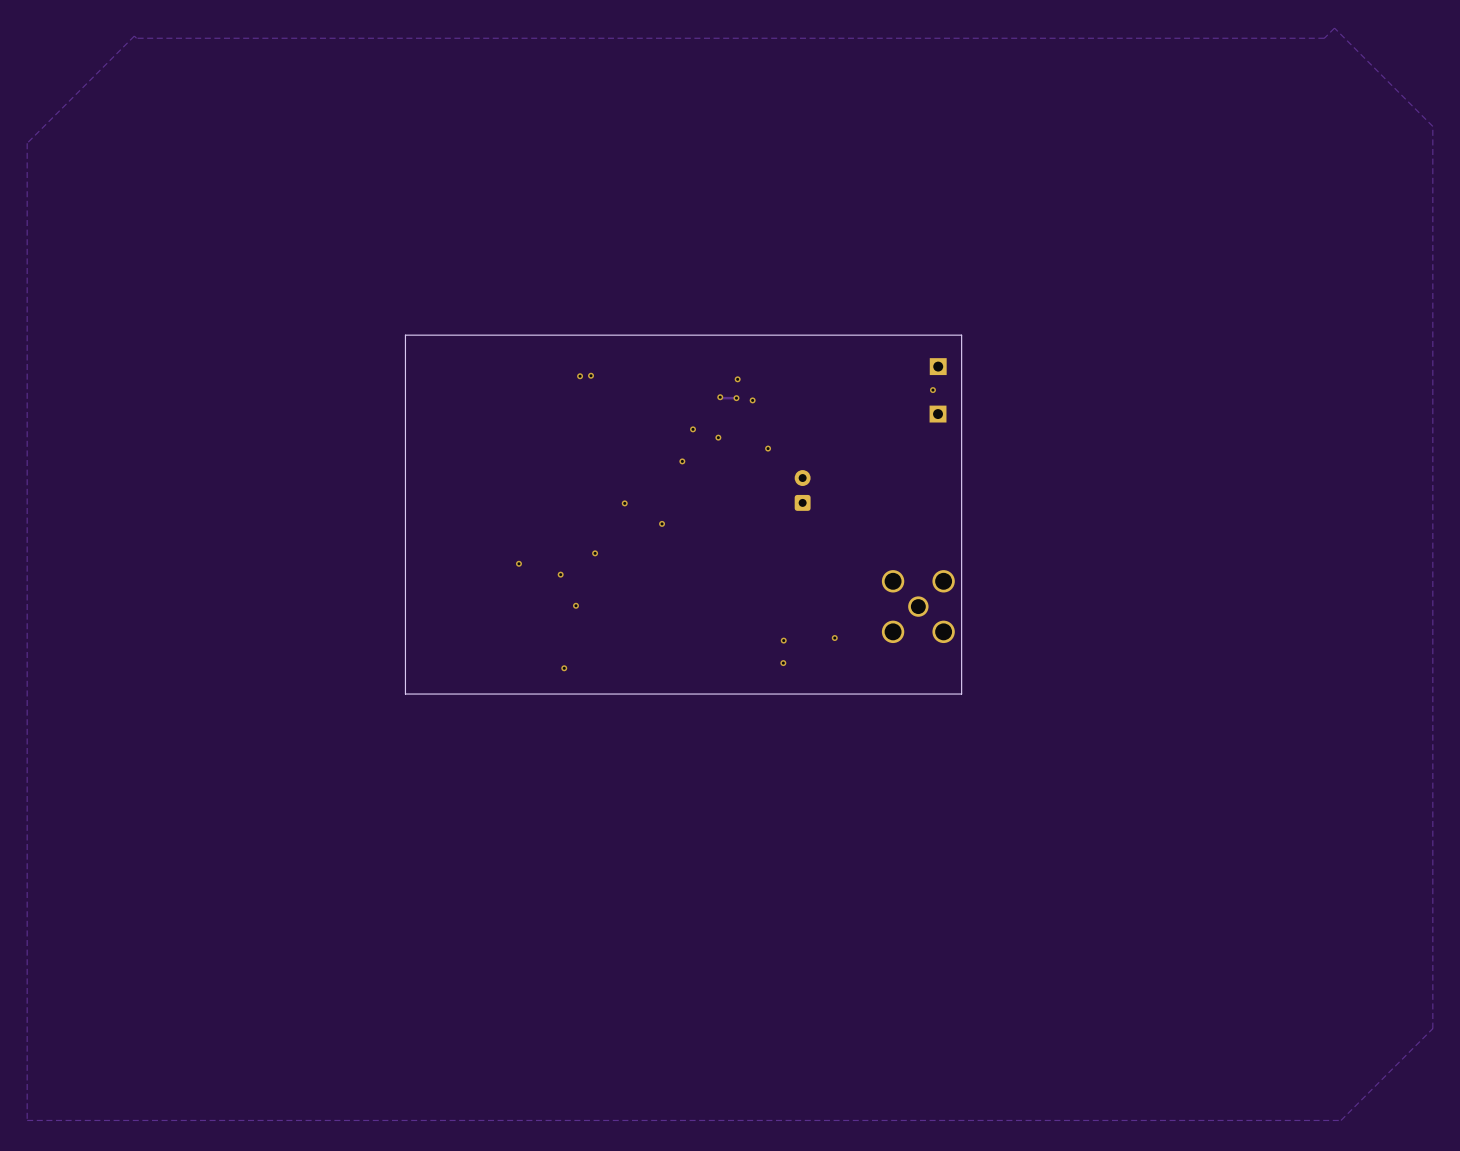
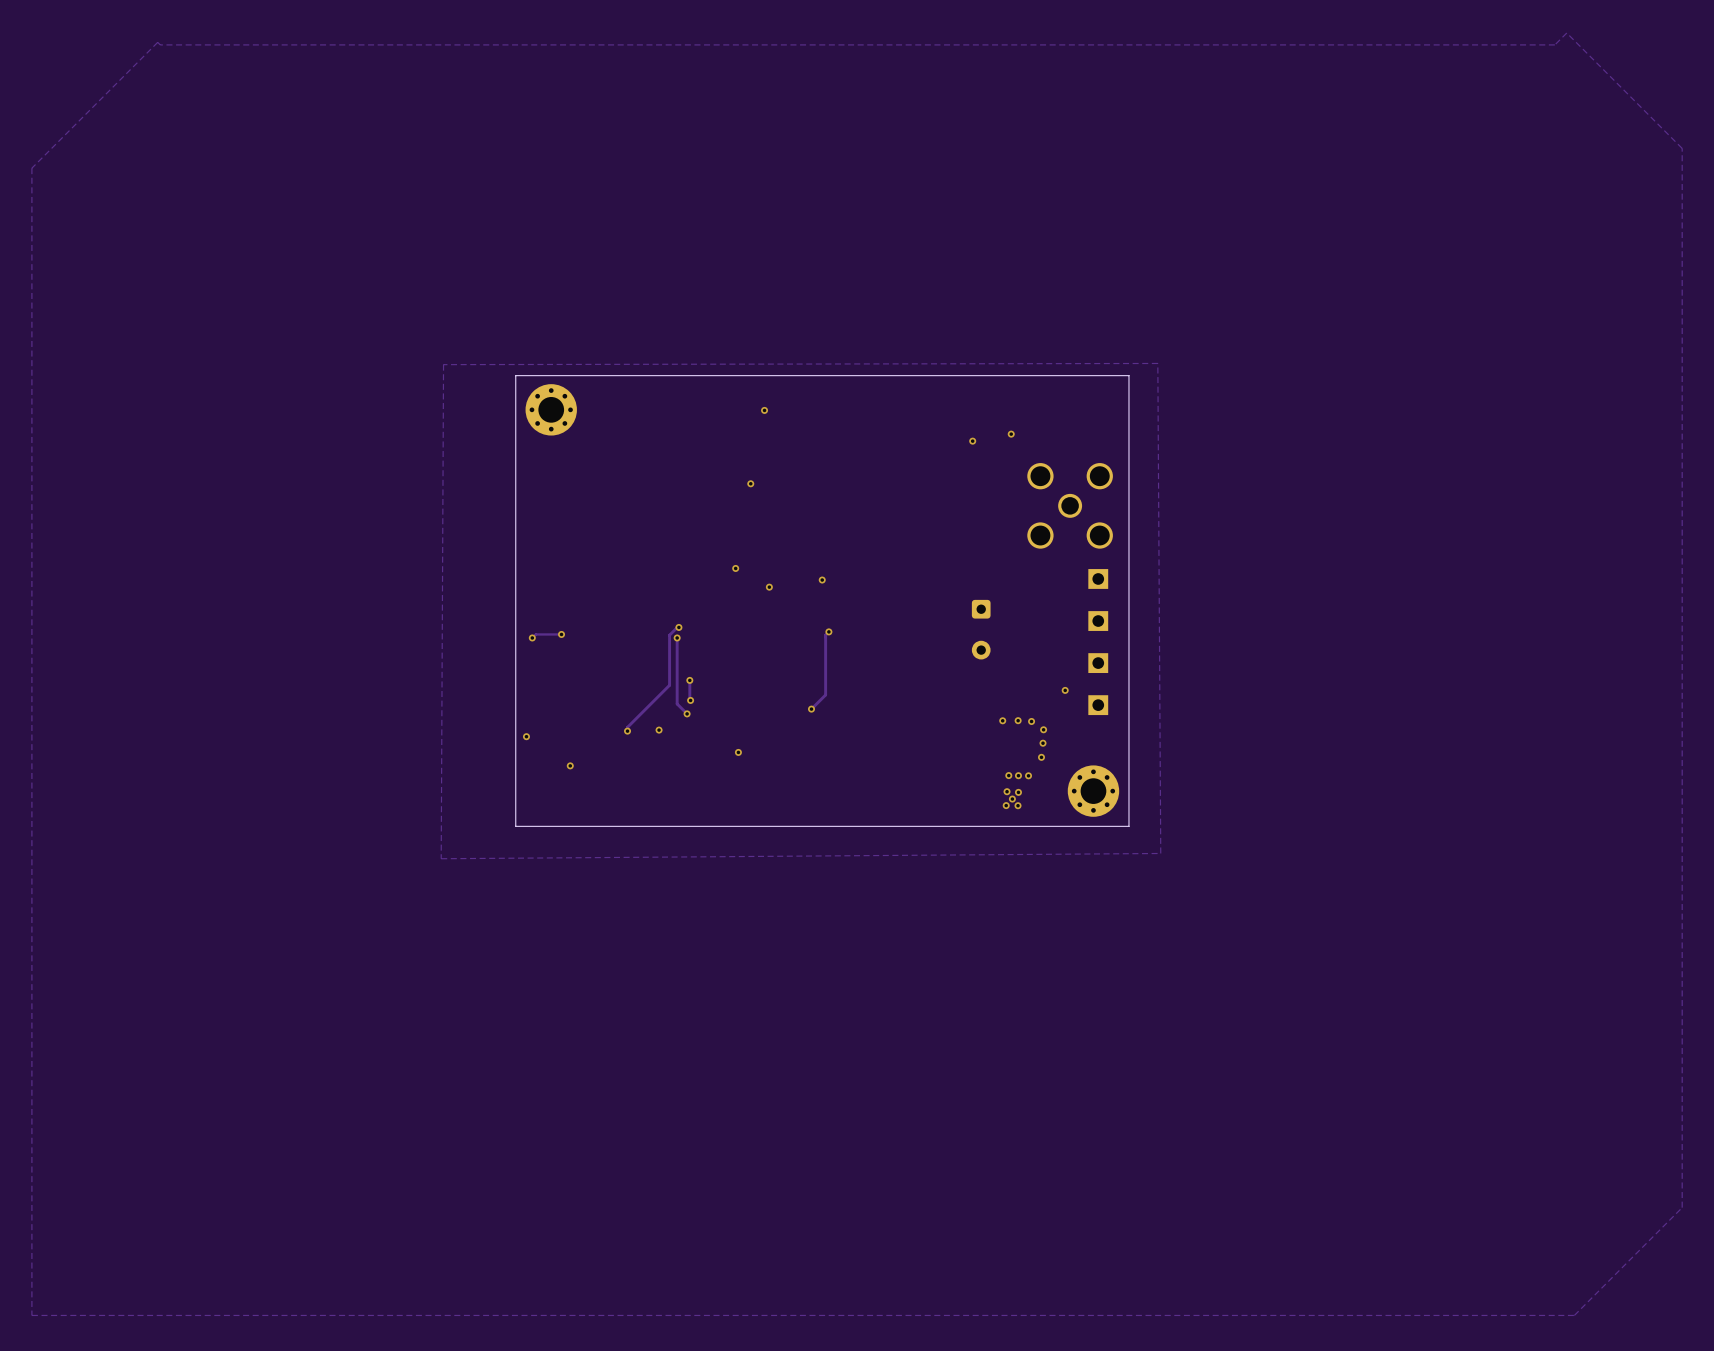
zone outline: none -> (1157, 363) (443, 364) (441, 858) (1160, 853) (1157, 363)
board edge: (961, 335) (405, 335) (405, 694) (961, 694) -> (1128, 393) (1128, 375) (515, 375) (515, 826) (1128, 826) (1128, 814)
part: none -> (551, 409)
via: none -> (764, 410)
part: (938, 366) -> none
via: none -> (1011, 434)
via: (591, 375) -> none
via: none -> (972, 441)
via: (580, 376) -> none
via: (737, 379) -> none
via: (932, 390) -> none
track: (720, 397) (736, 398) -> none
via: (720, 397) -> none
via: (736, 398) -> none
via: (752, 400) -> none
via: none -> (750, 483)
part: (938, 414) -> none
via: (693, 429) -> none
via: (718, 437) -> none
via: (768, 448) -> none
via: (682, 461) -> none
via: none -> (735, 568)
part: (802, 490) -> none
part: none -> (1098, 578)
via: none -> (822, 580)
via: none -> (769, 587)
via: (624, 503) -> none
via: (662, 523) -> none
part: none -> (1098, 621)
track: none -> (678, 627) (669, 635) (669, 685) (627, 727) (627, 731)
via: none -> (678, 627)
part: none -> (981, 629)
track: none -> (828, 631) (825, 635) (825, 694) (811, 709)
via: none -> (828, 631)
track: none -> (561, 634) (535, 634) (532, 637)
via: none -> (561, 634)
via: none -> (532, 637)
track: none -> (677, 637) (677, 703) (687, 713)
via: none -> (677, 637)
via: (595, 553) -> none
via: (518, 563) -> none
part: none -> (1098, 663)
via: (560, 574) -> none
track: none -> (689, 680) (690, 700)
via: none -> (689, 680)
via: none -> (1065, 690)
via: none -> (690, 700)
part: none -> (1098, 705)
via: none -> (811, 709)
via: (575, 605) -> none
part position: (918, 606) -> (1070, 505)
via: none -> (687, 713)
via: none -> (1002, 720)
via: none -> (1018, 720)
via: none -> (1031, 721)
via: none -> (659, 730)
via: none -> (1043, 729)
via: none -> (627, 731)
via: none -> (526, 736)
via: none -> (1043, 743)
via: (834, 638) -> none
via: none -> (738, 752)
via: (783, 640) -> none
via: none -> (1041, 757)
via: none -> (570, 765)
via: none -> (1008, 775)
via: none -> (1018, 775)
via: none -> (1028, 775)
via: (783, 663) -> none
via: (564, 668) -> none
part: none -> (1093, 791)
via: none -> (1007, 791)
via: none -> (1018, 792)
via: none -> (1012, 799)
via: none -> (1006, 805)
via: none -> (1018, 805)

